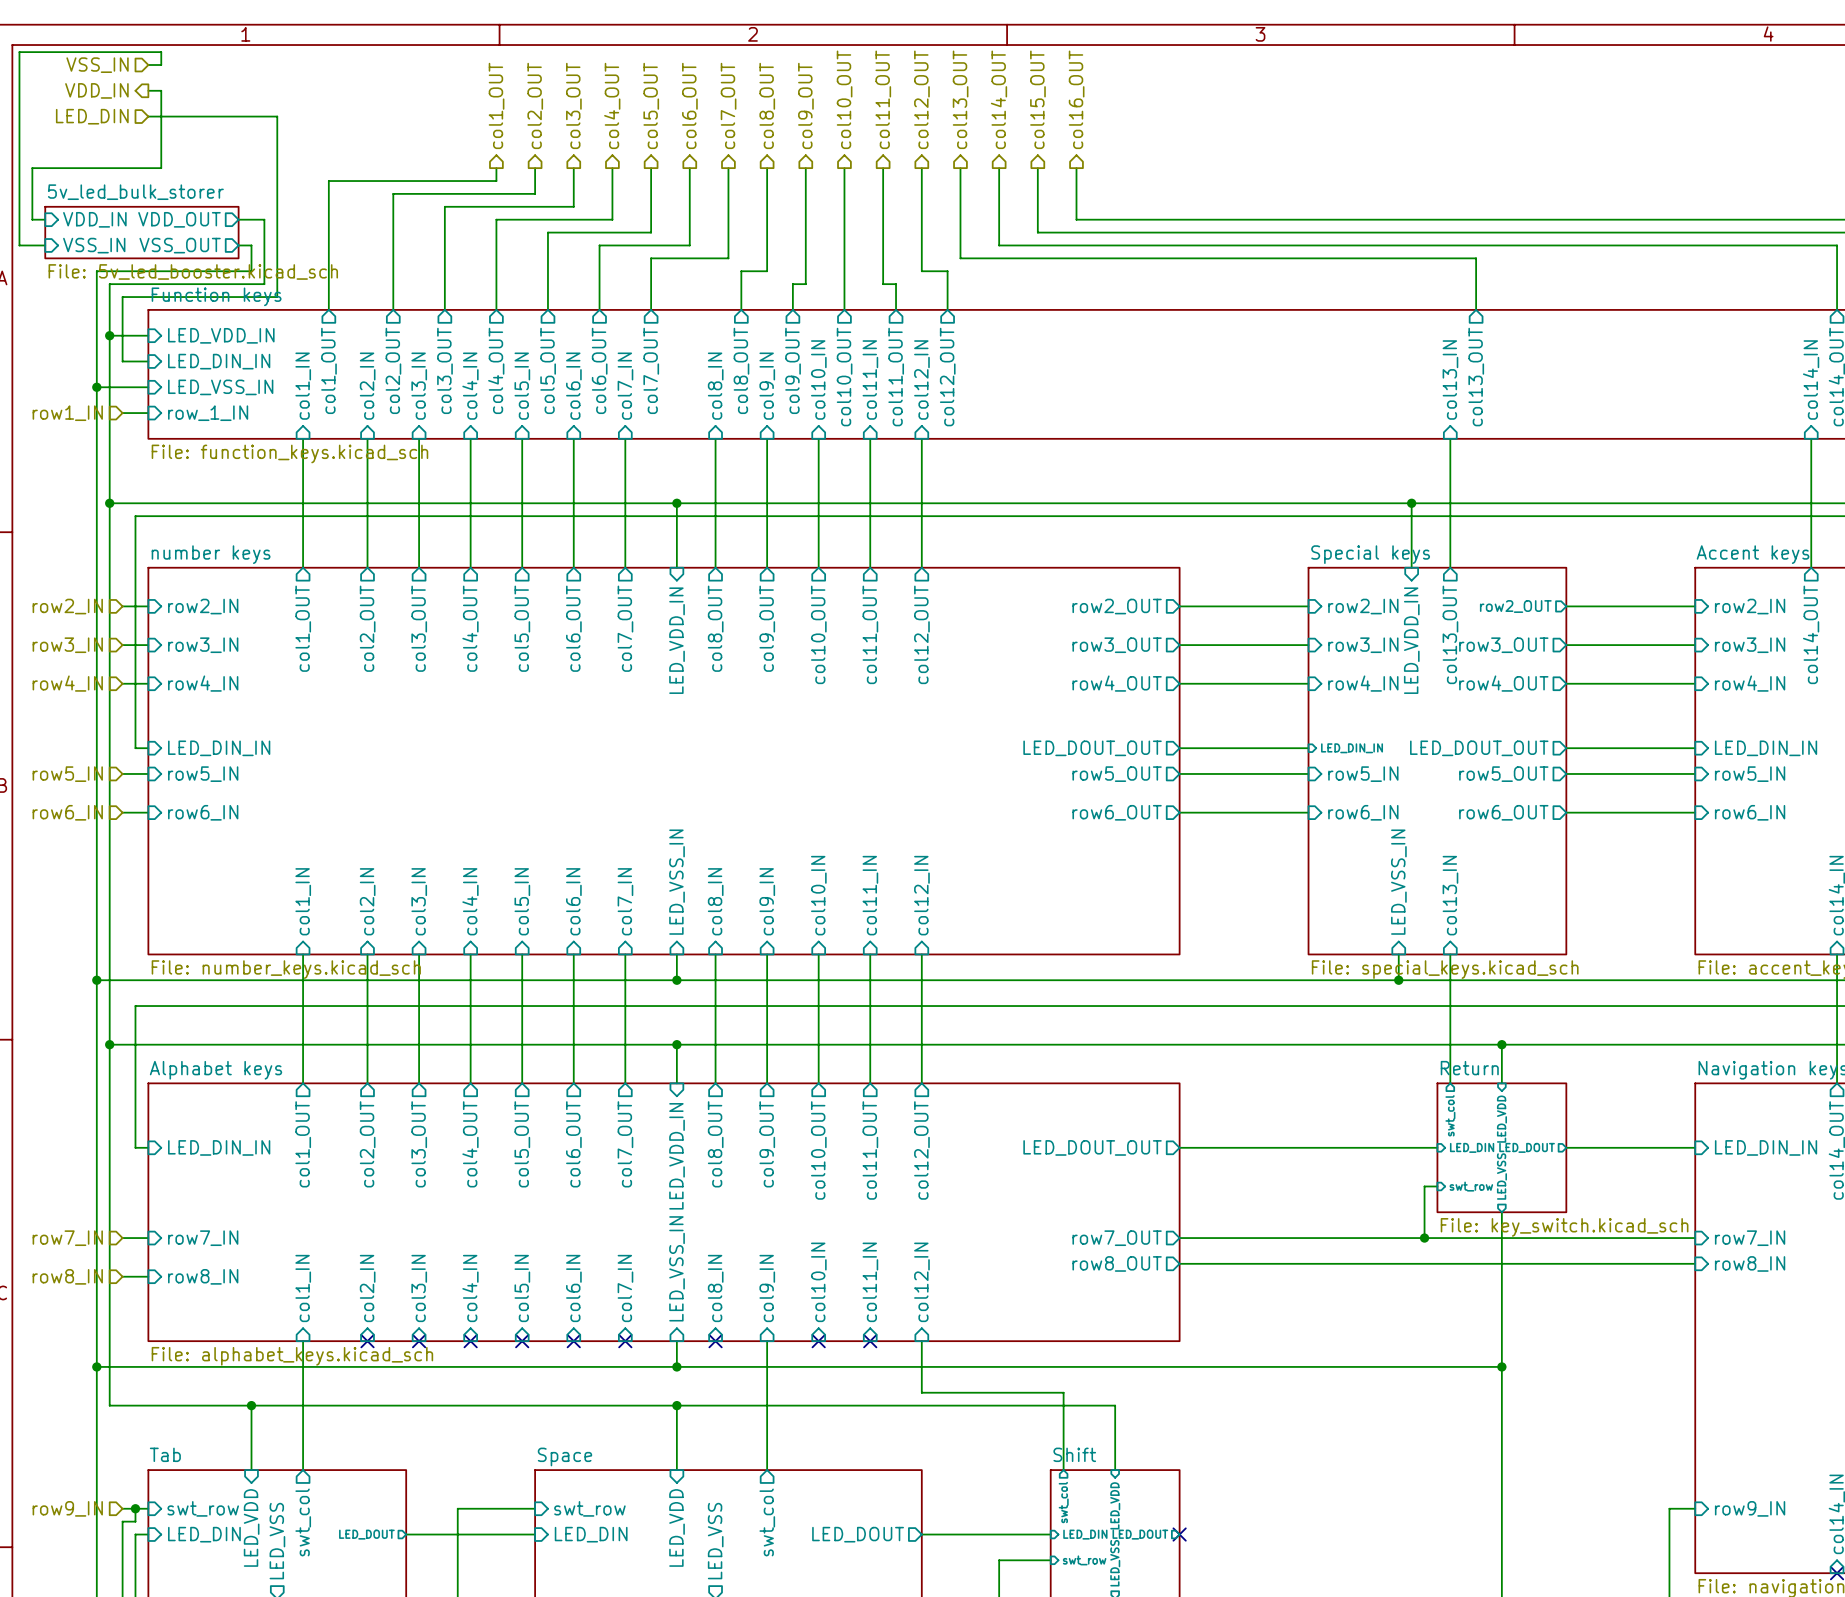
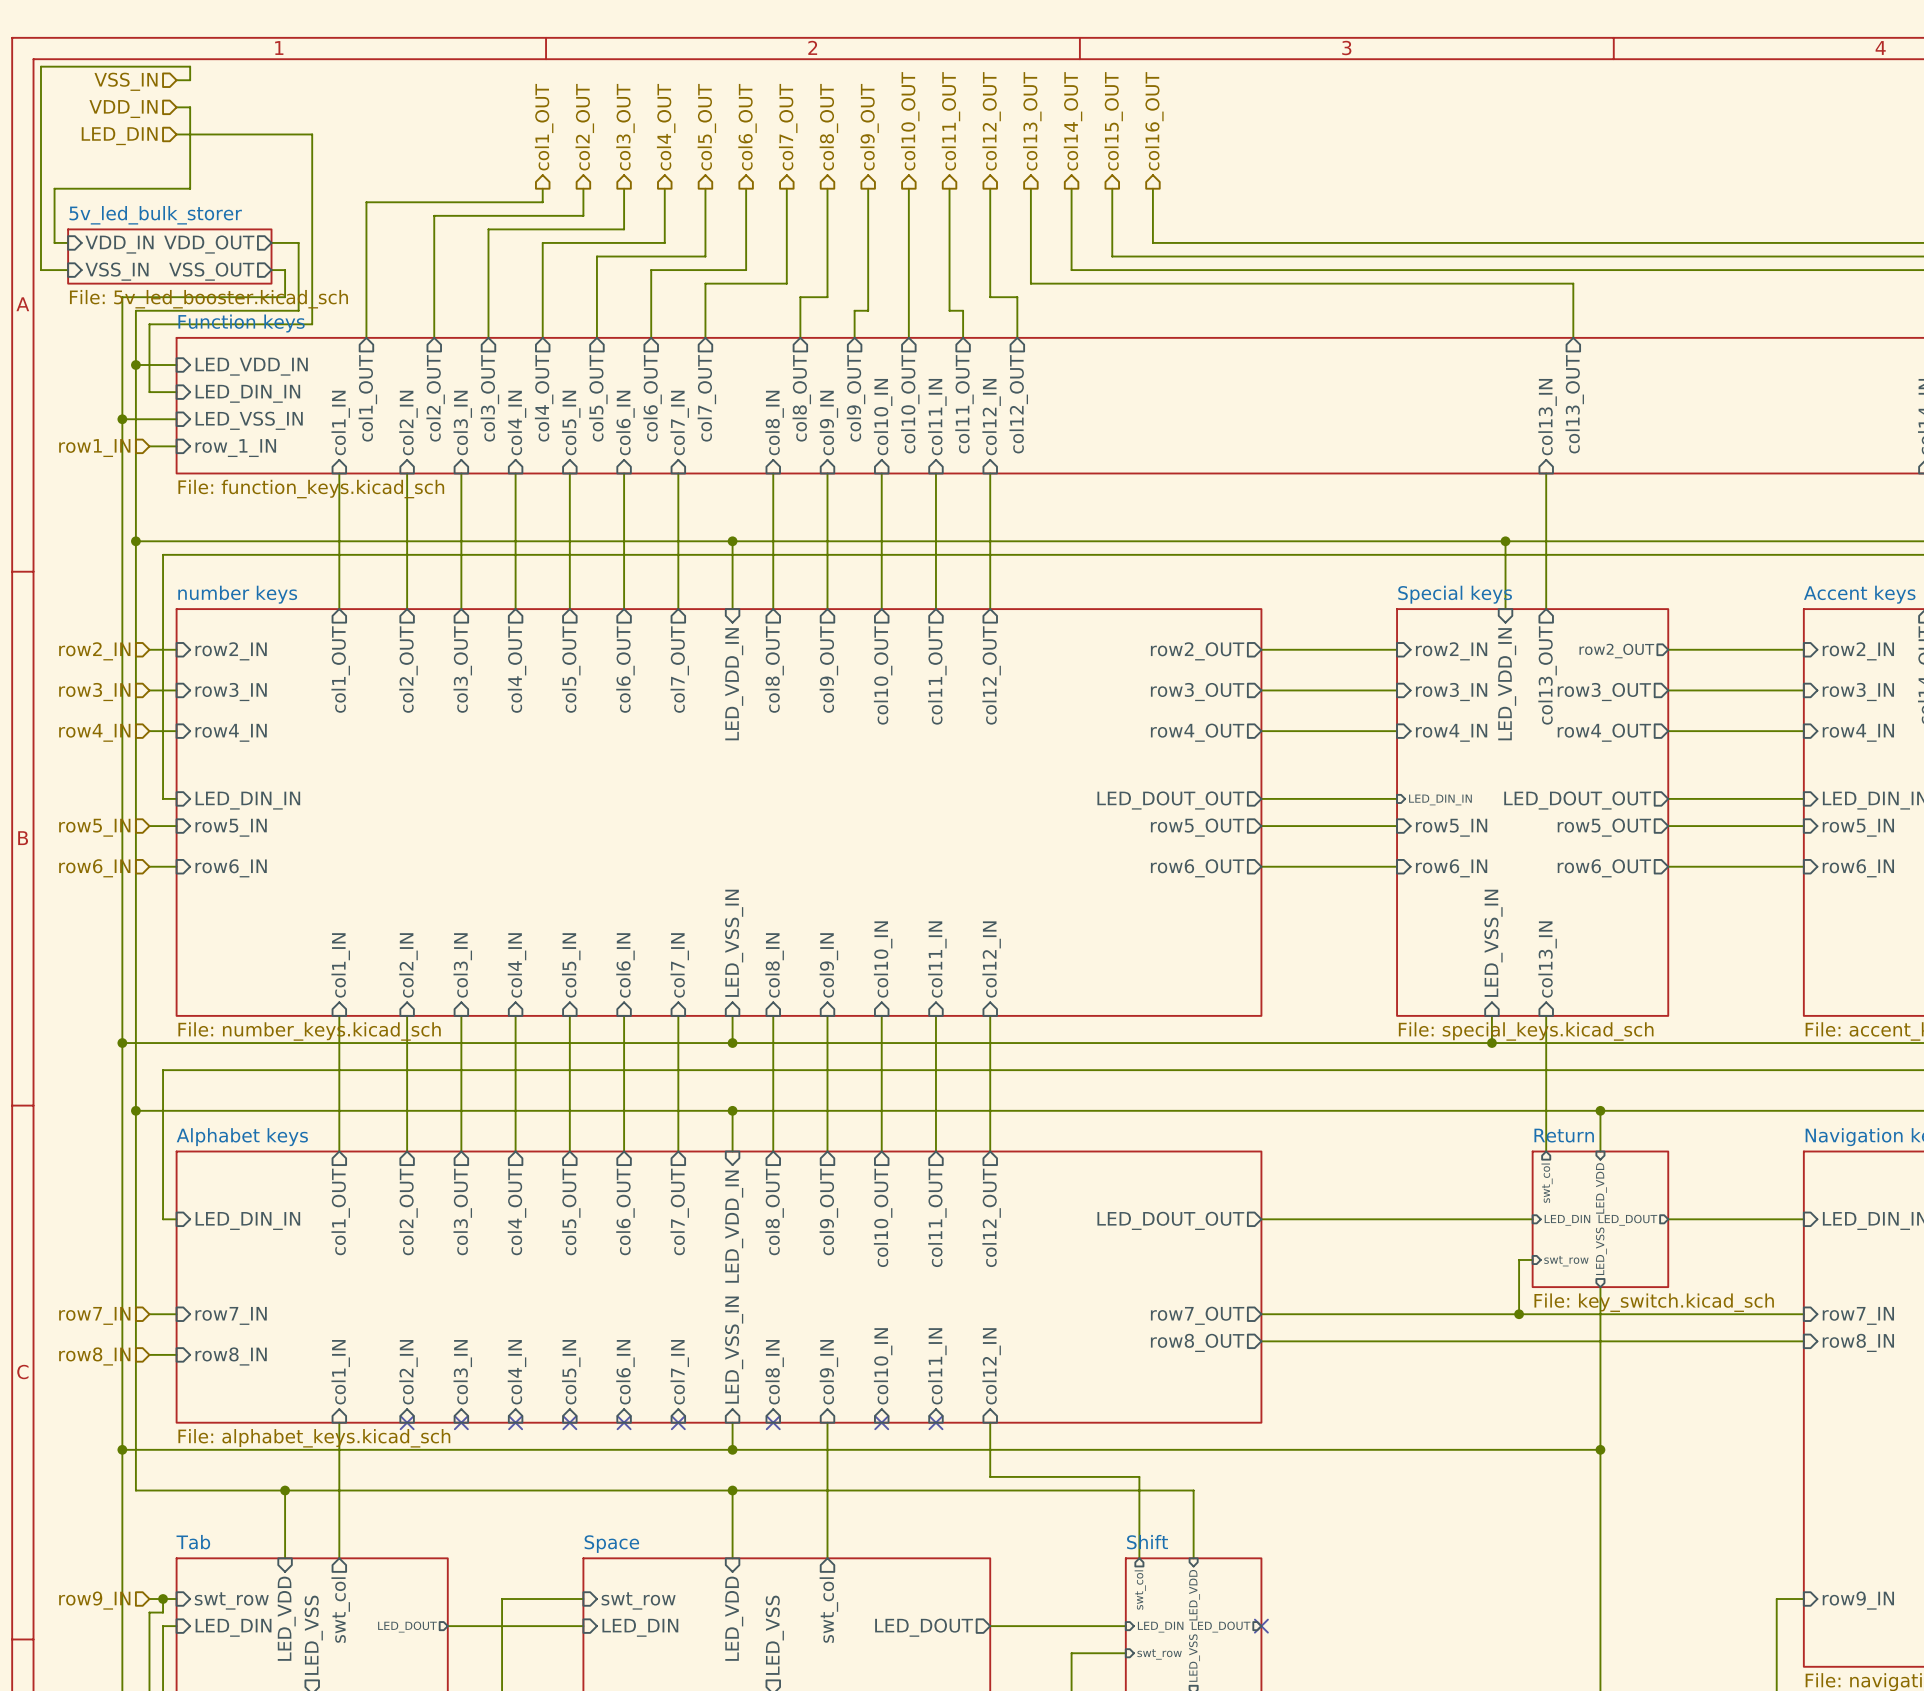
hierarchical label shape: output (96, 90) -> input (123, 109)

